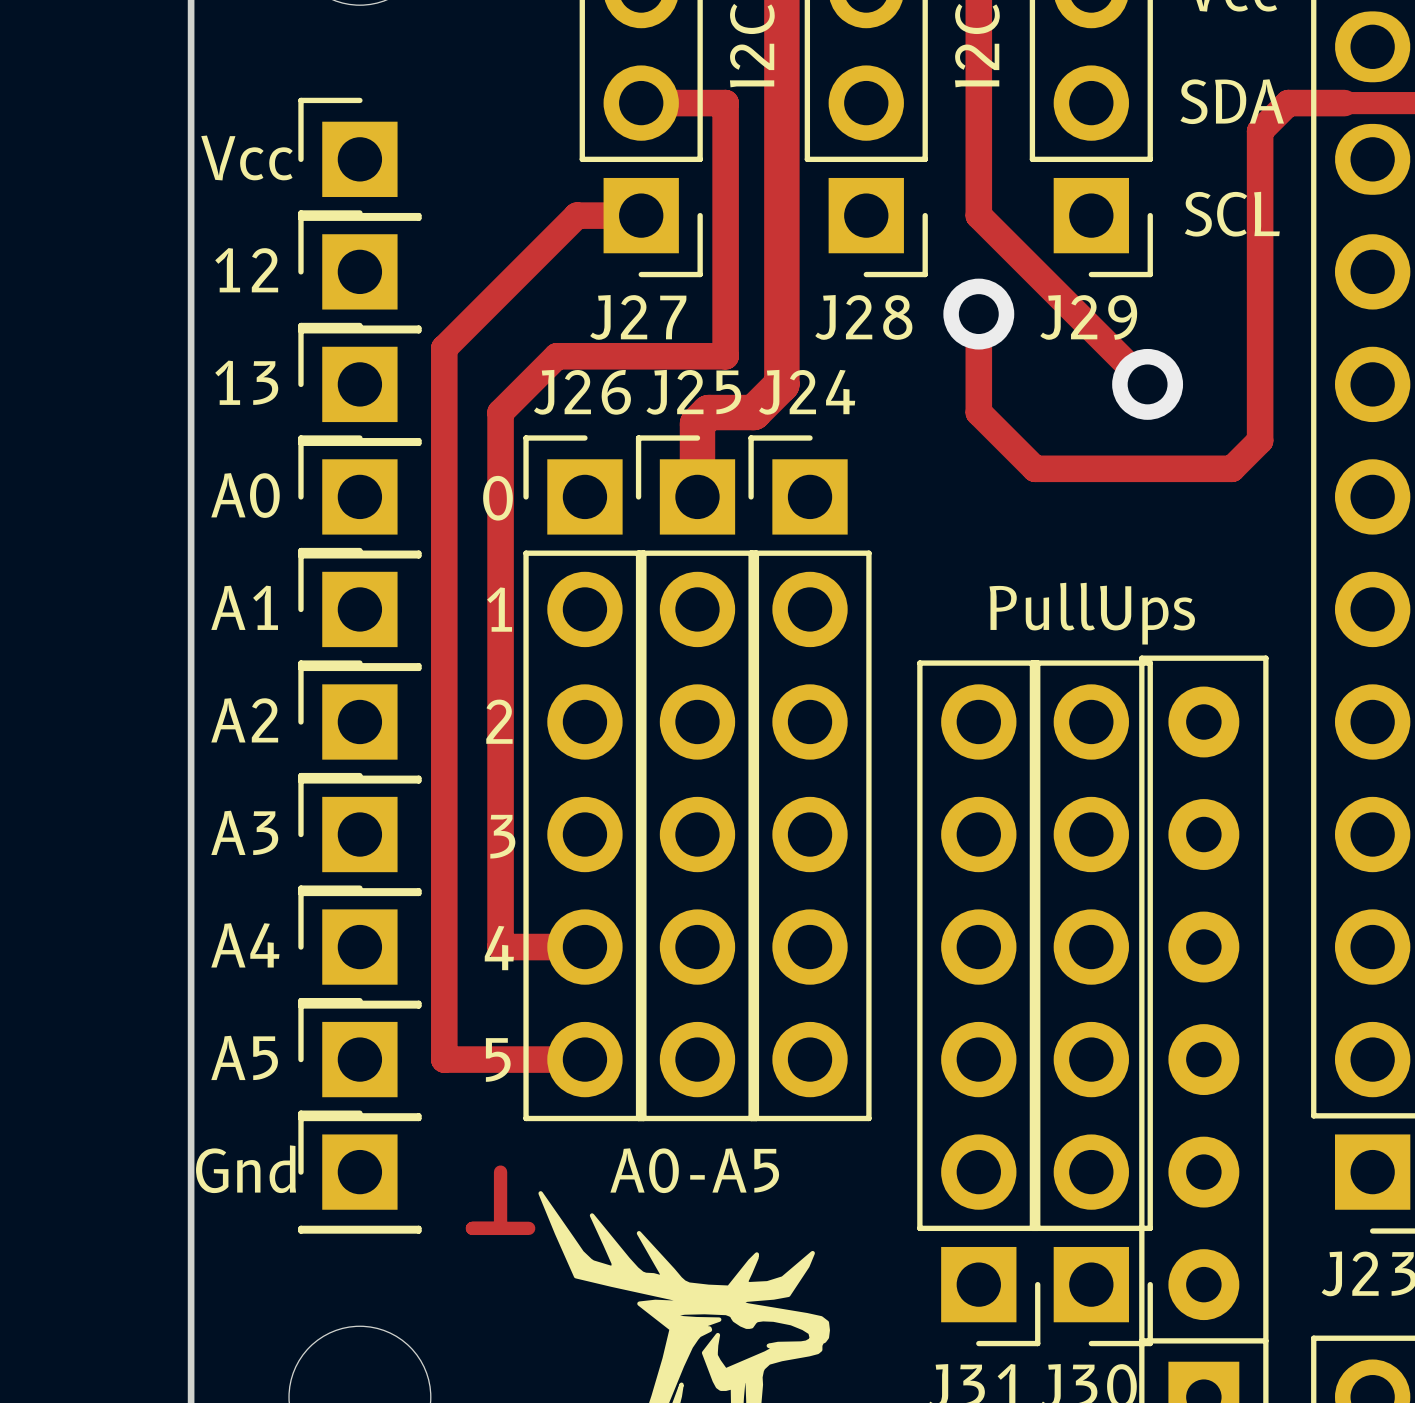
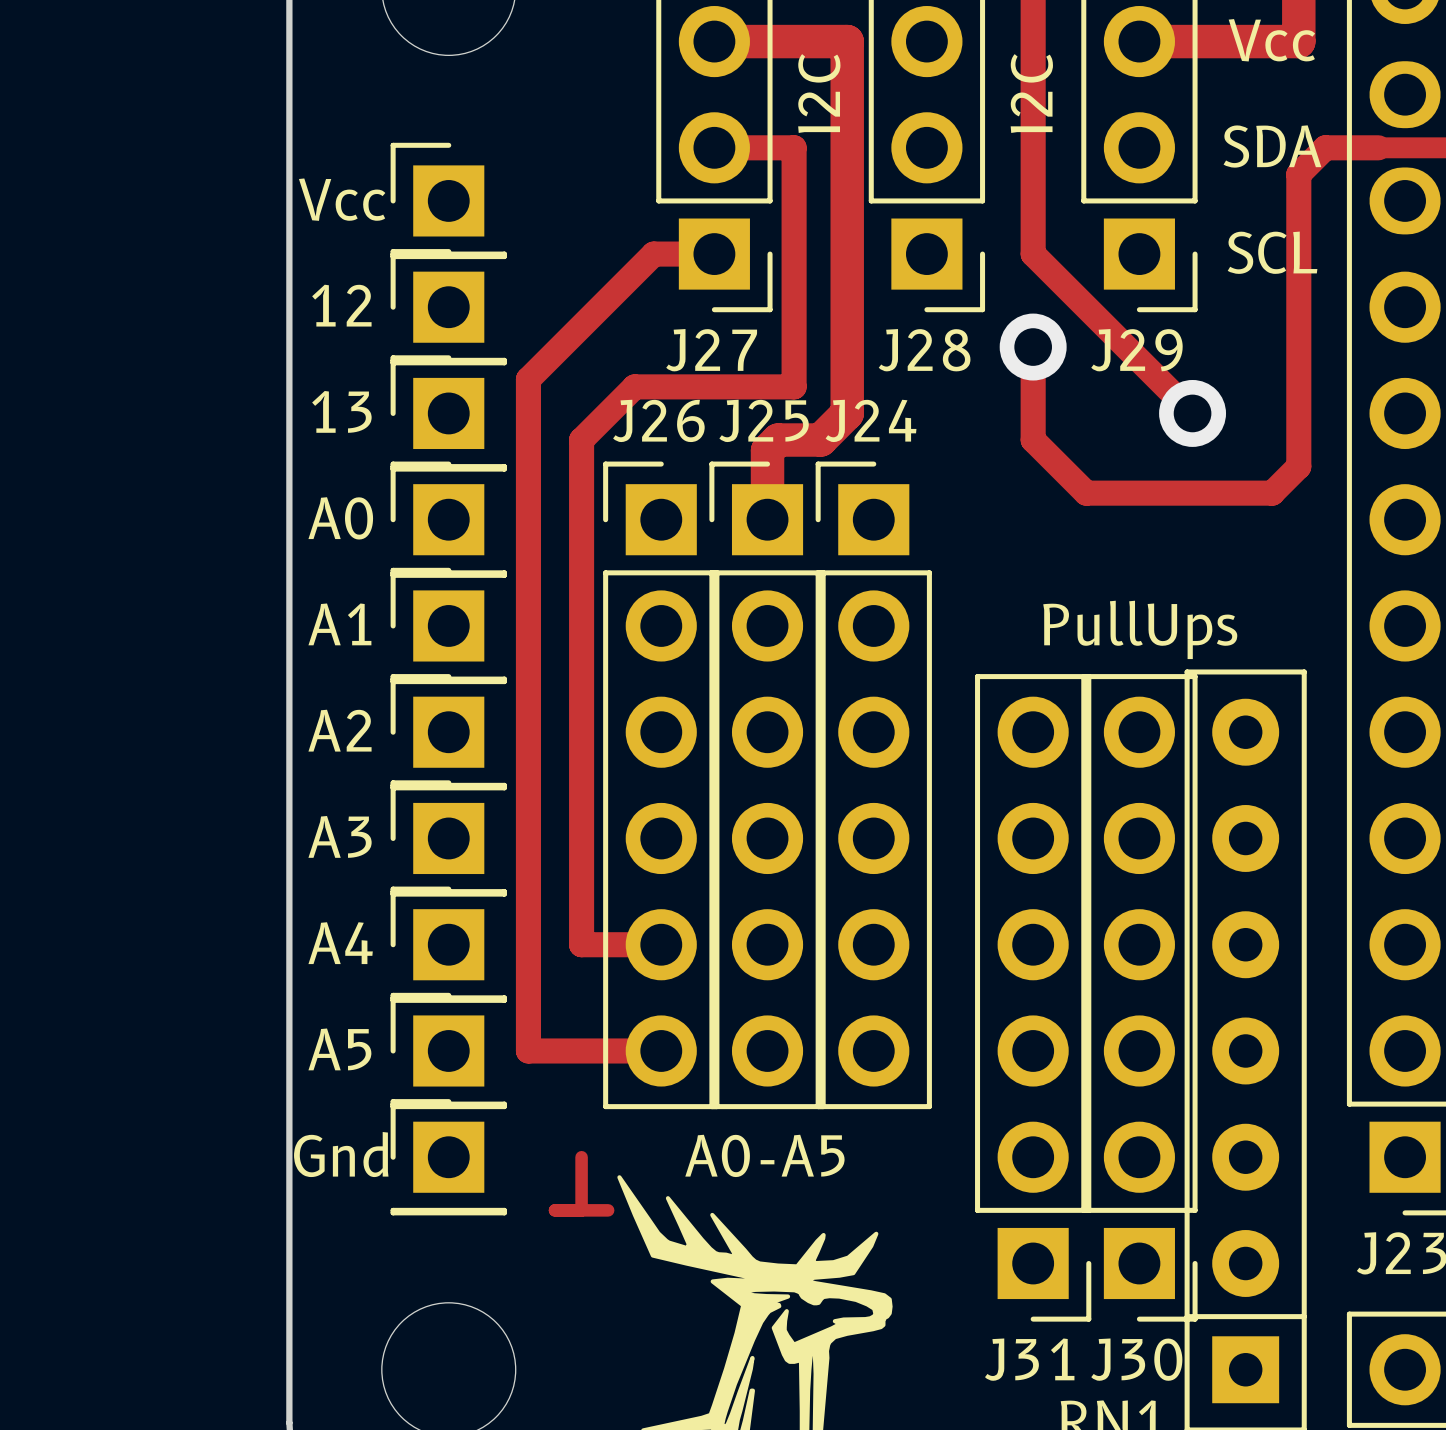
text: 0 (498, 498) -> none
text: 1 (499, 609) -> none
text: 2 (499, 721) -> none
text: 3 (502, 836) -> none
text: 4 (499, 948) -> none
text: 5 (498, 1059) -> none

